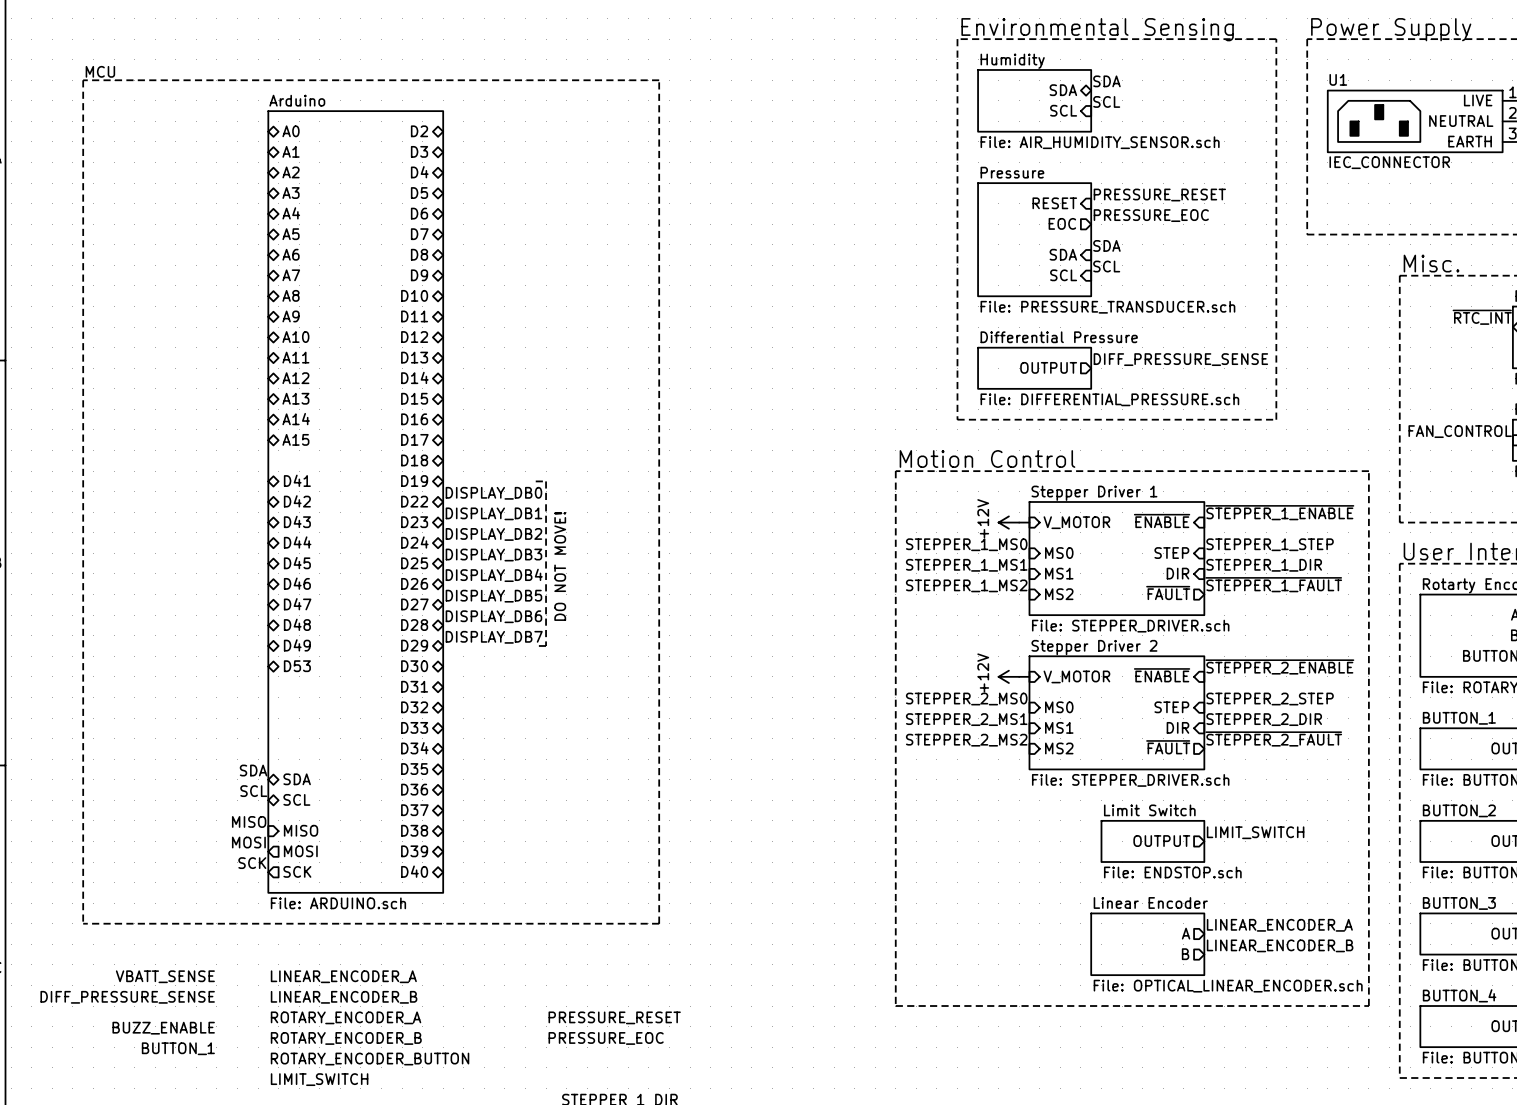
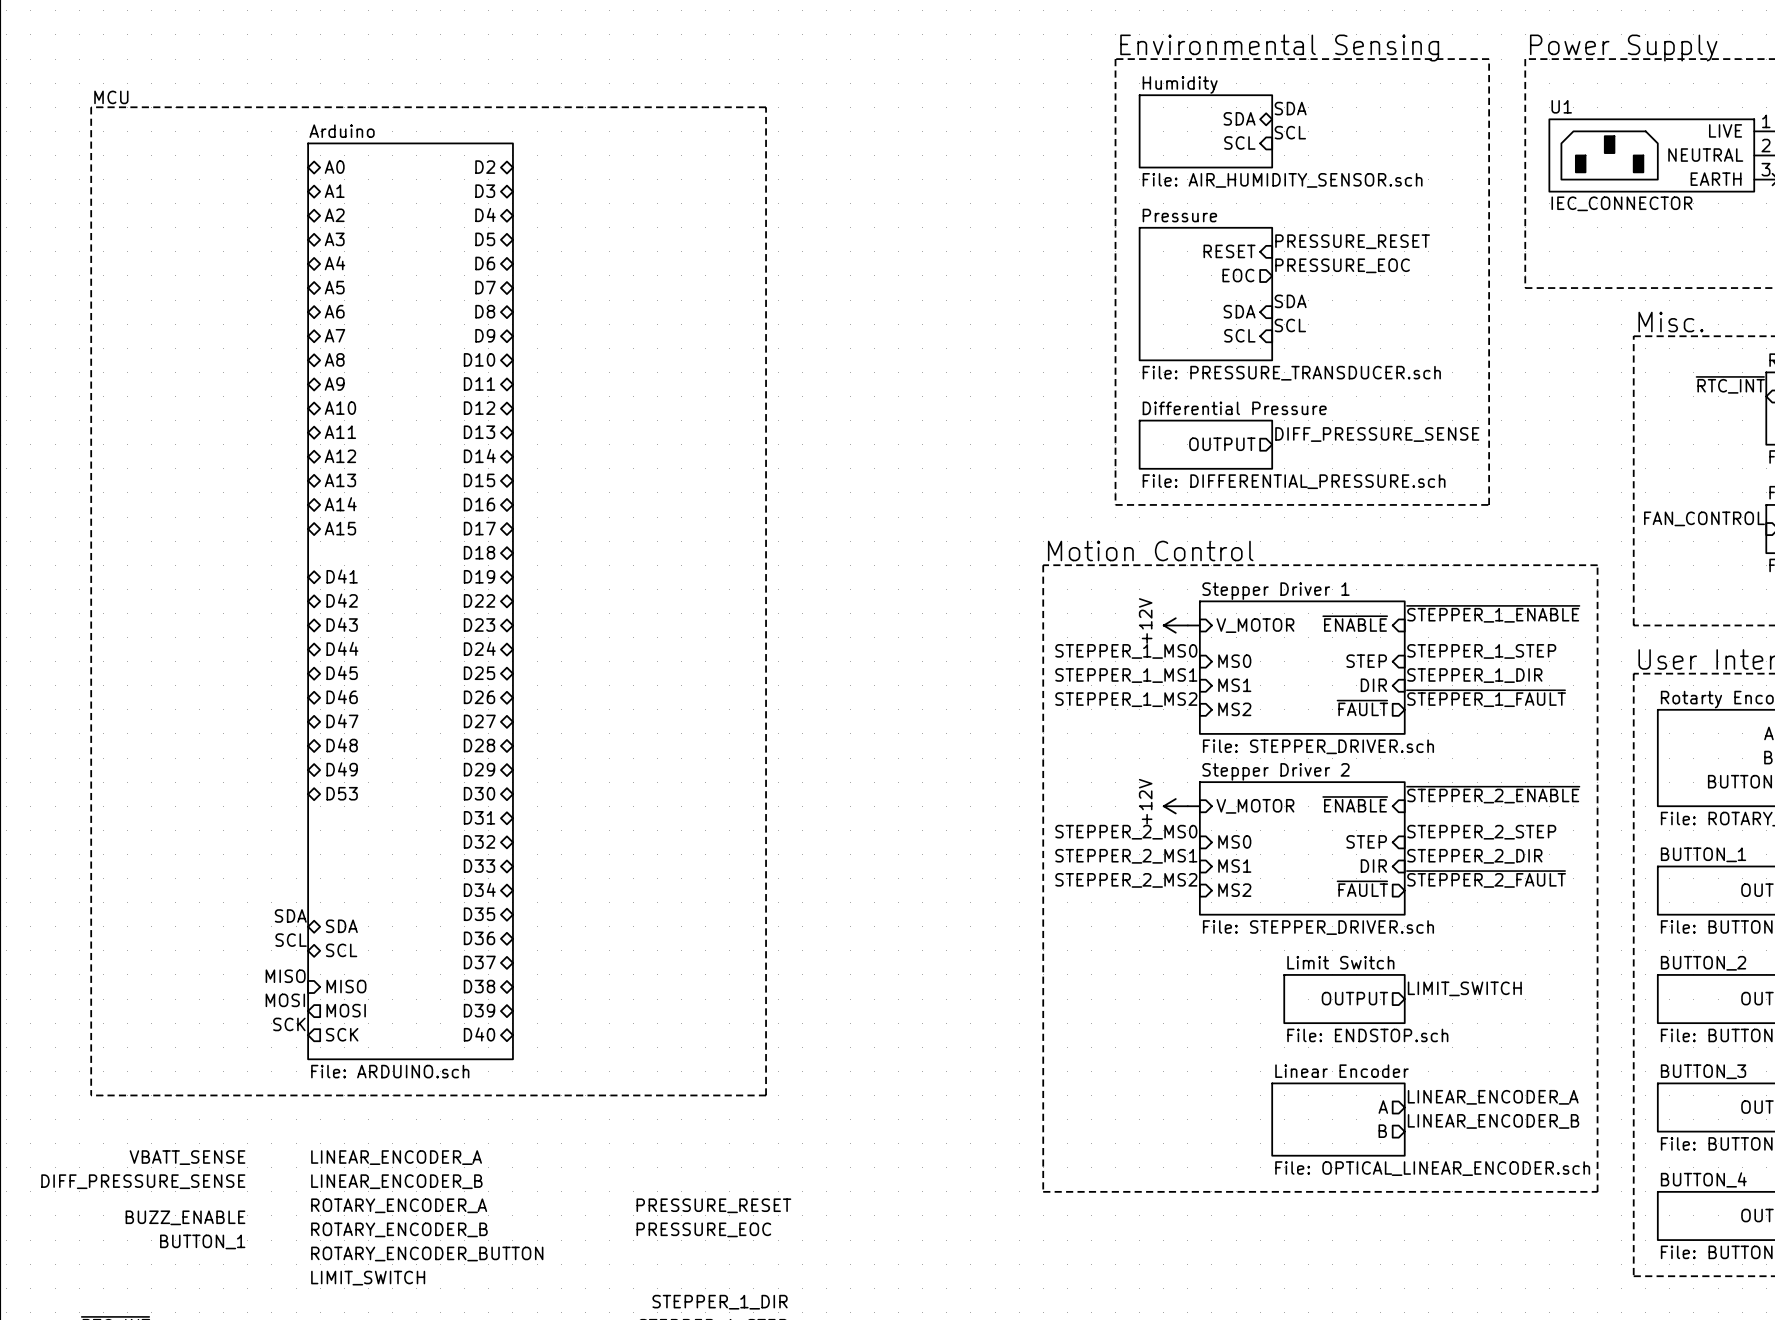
line: (535, 481) (546, 481) (546, 645) (535, 645) -> none
label: DISPLAY_DB0 (493, 493) -> none
label: DISPLAY_DB1 (493, 513) -> none
label: DISPLAY_DB2 (493, 534) -> none
label: DISPLAY_DB3 (493, 555) -> none
text: DO NOT MOVE! (560, 566) -> none
label: DISPLAY_DB4 (494, 575) -> none
label: DISPLAY_DB5 (493, 596) -> none
label: DISPLAY_DB6 (493, 616) -> none
label: DISPLAY_DB7 (494, 637) -> none

